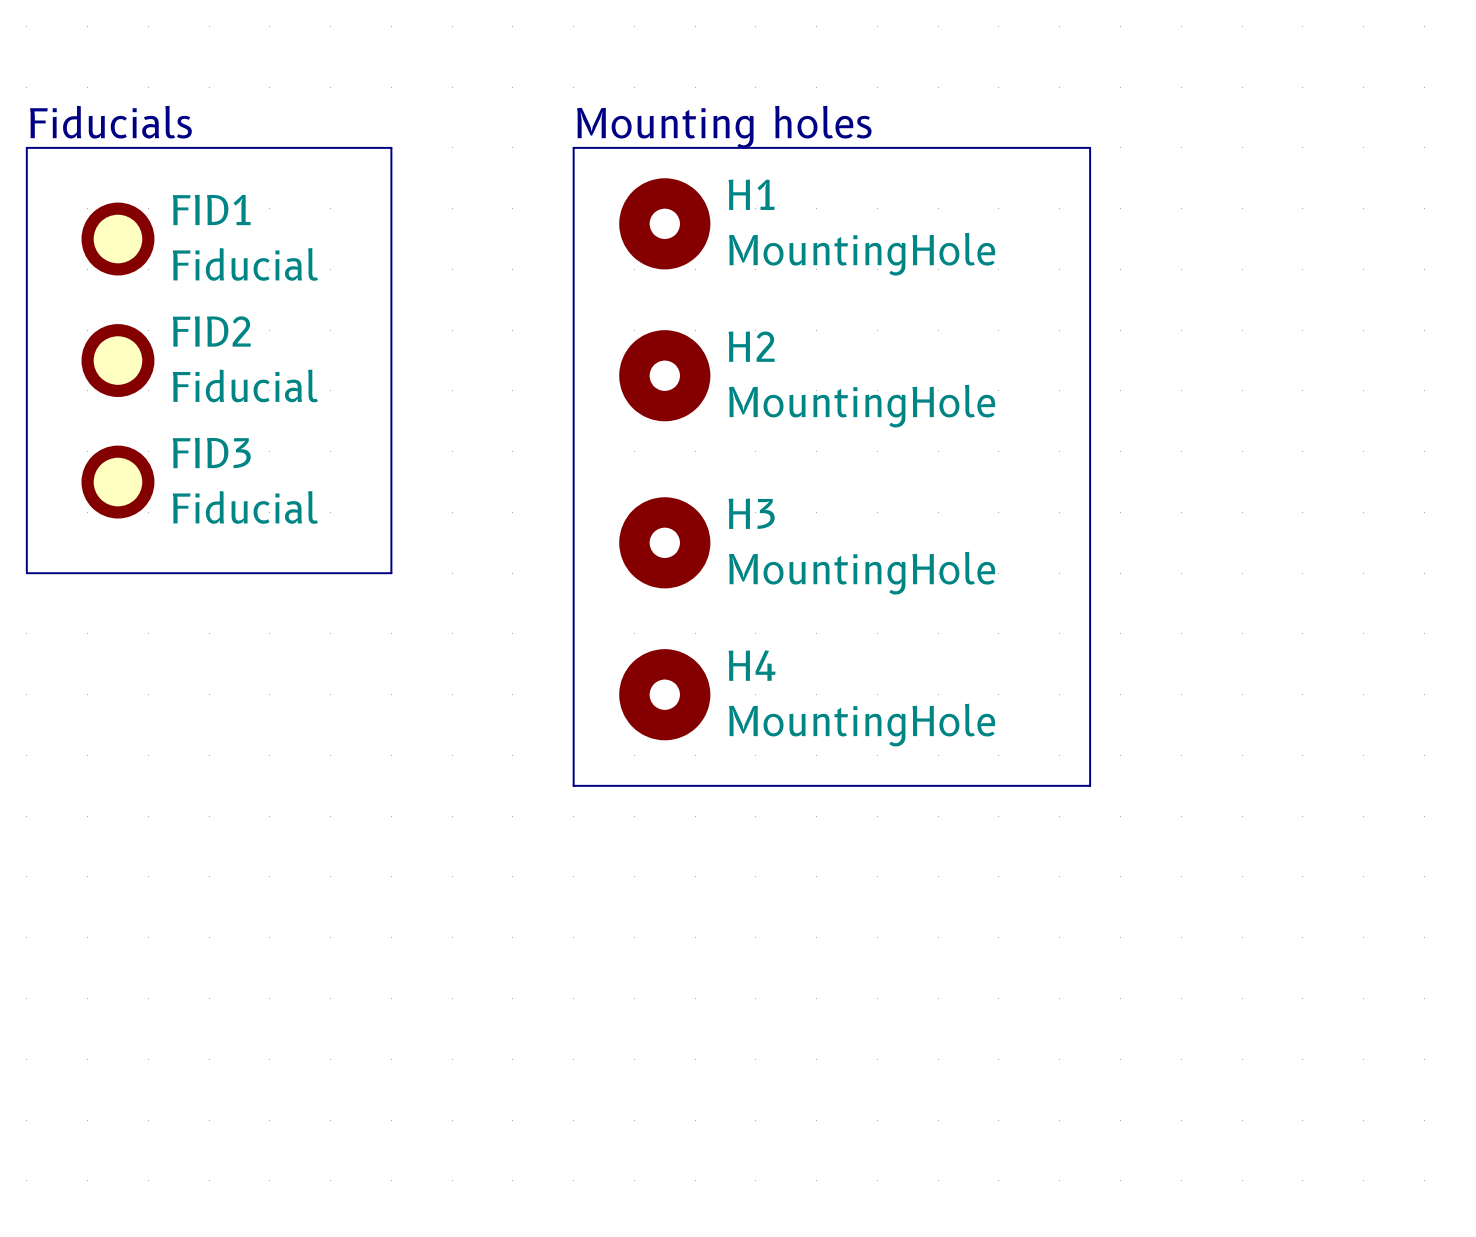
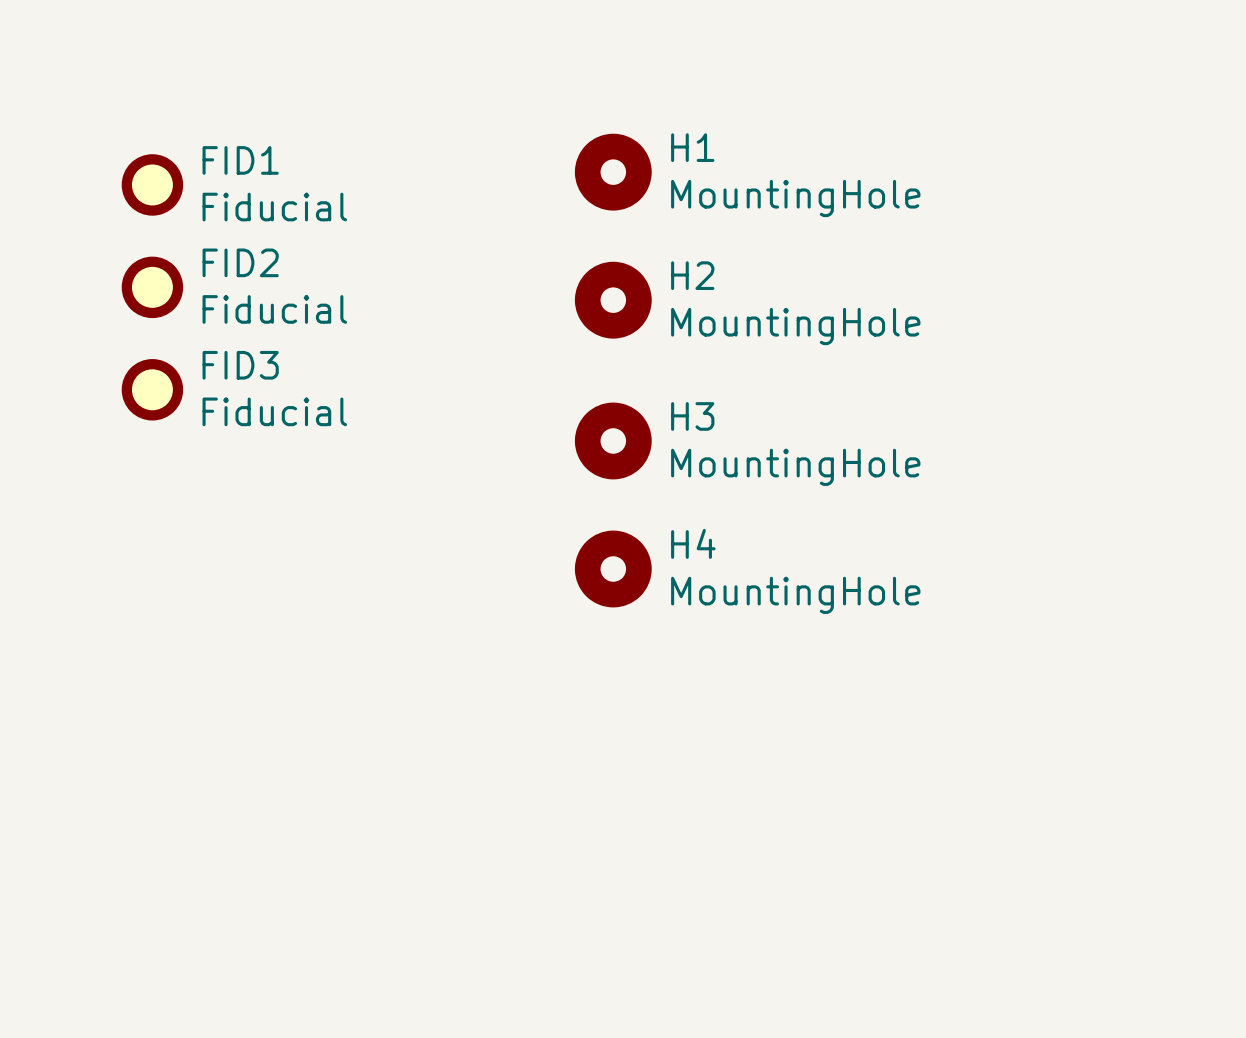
text: Fiducials (110, 122) -> none
text: Mounting holes (724, 127) -> none
line: (26, 147) (391, 147) (391, 573) (26, 573) (26, 147) -> none
line: (573, 147) (1090, 147) (1090, 785) (573, 785) (573, 147) -> none

